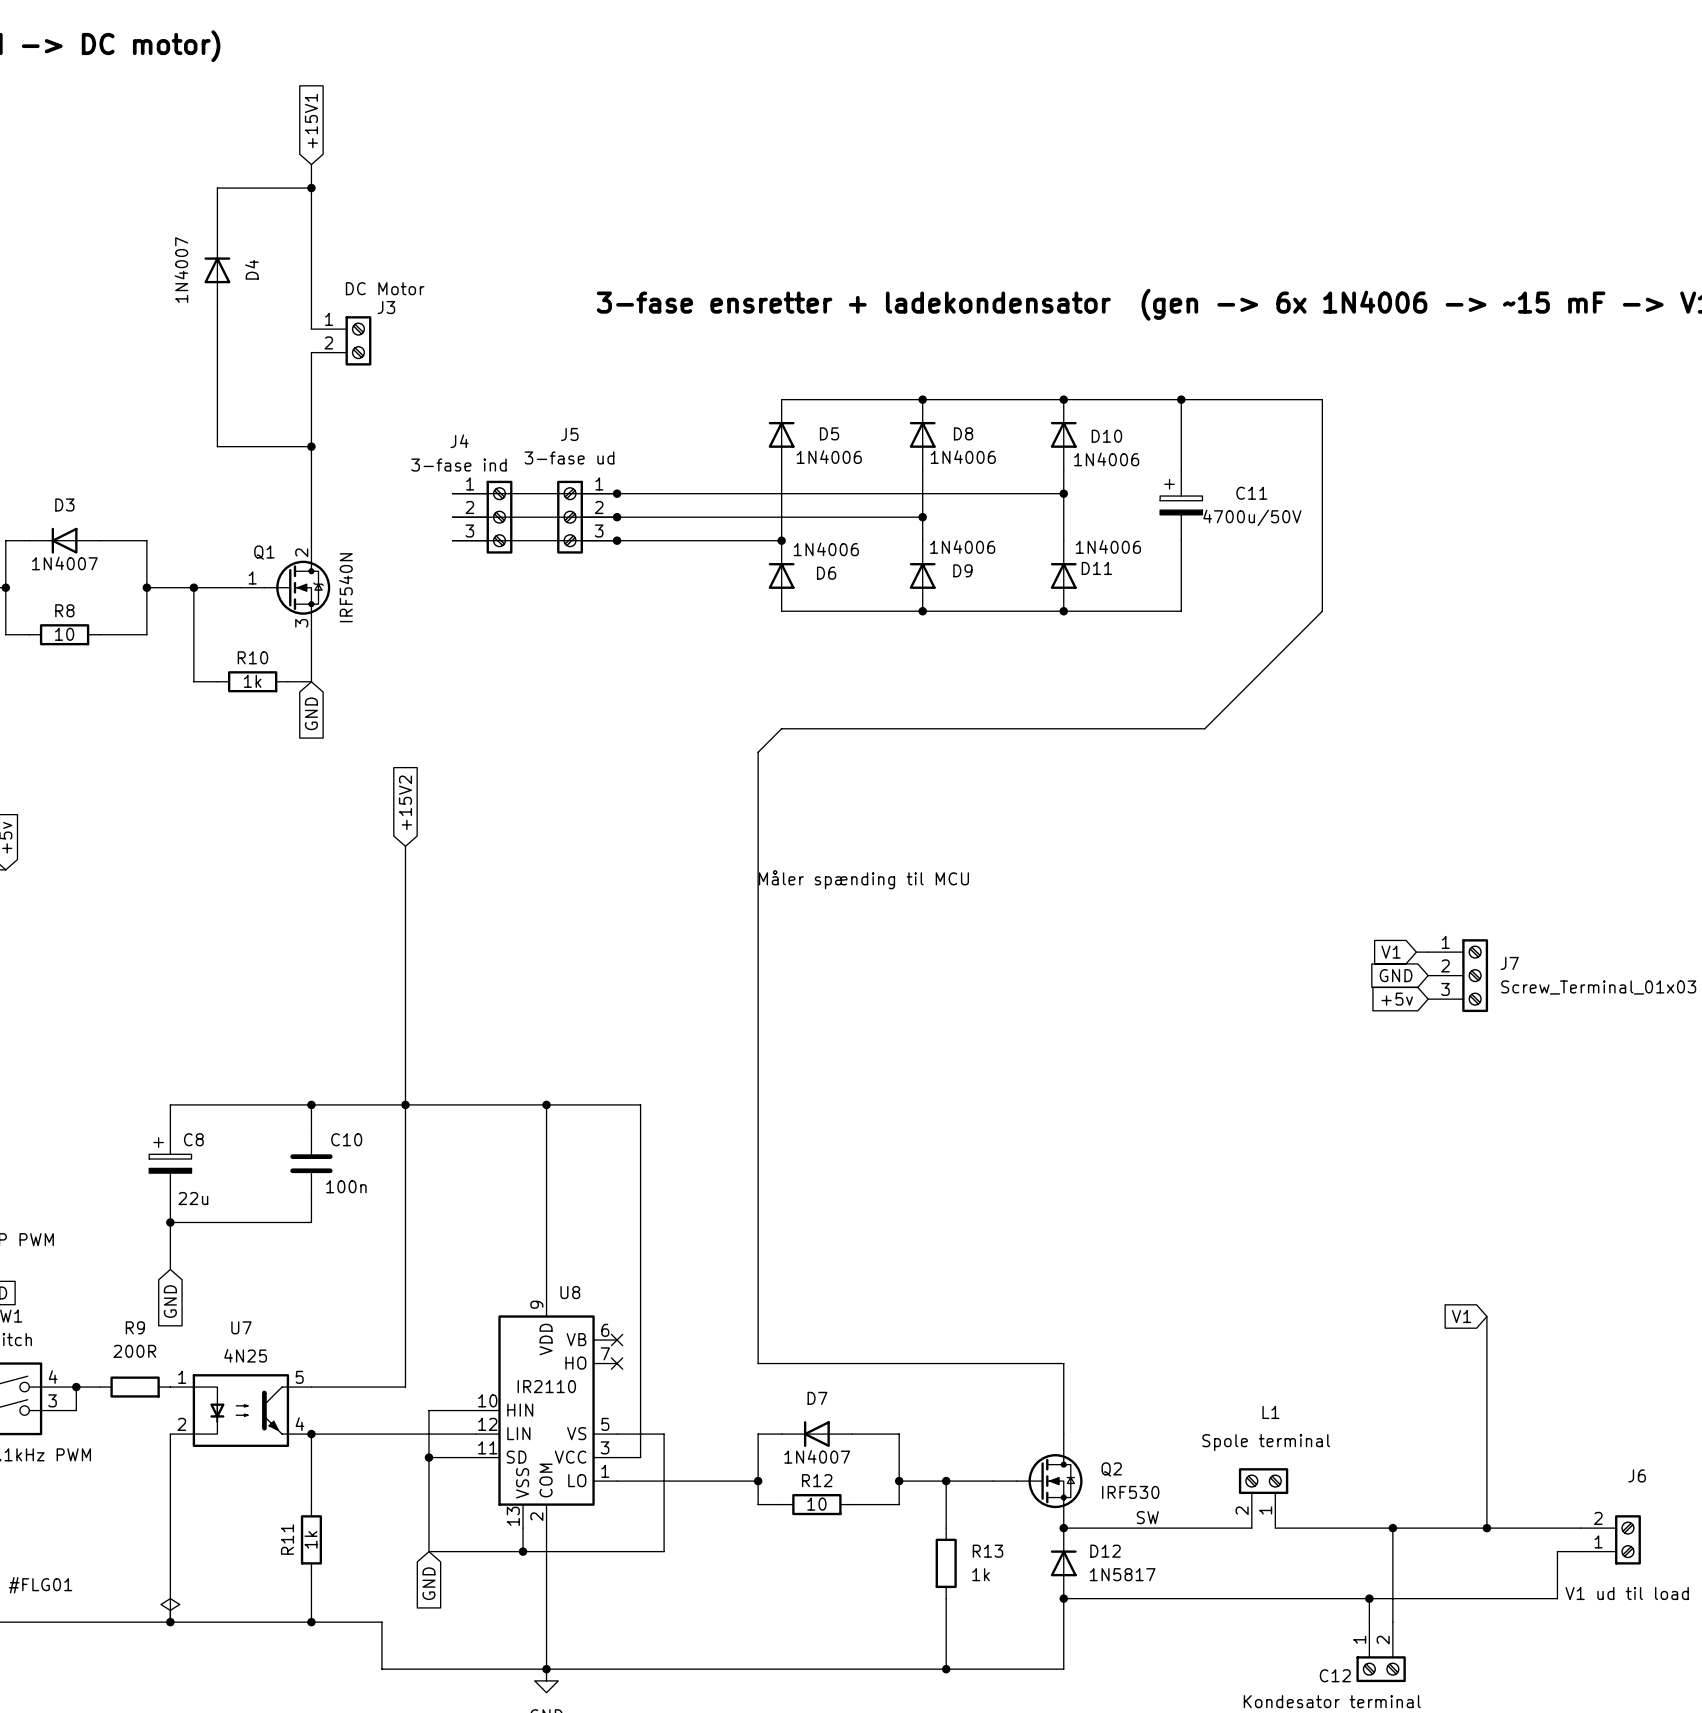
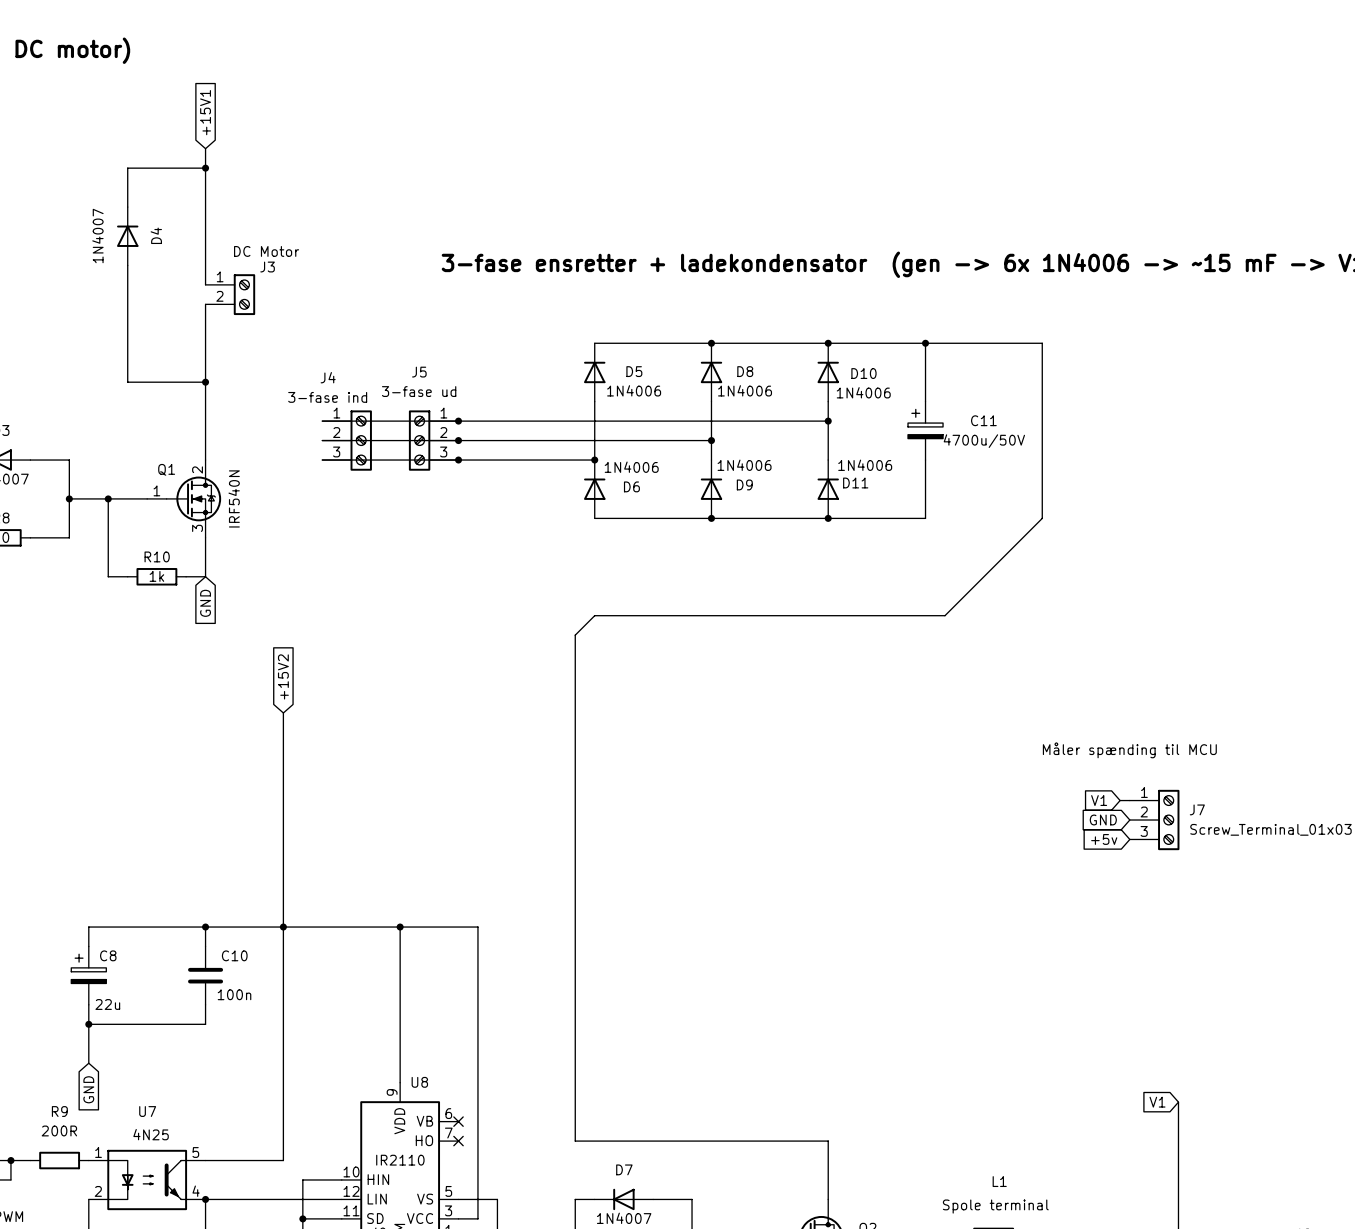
text: Måler spænding til MCU (863, 879) -> none
text: none -> Måler spænding til MCU (1129, 750)

